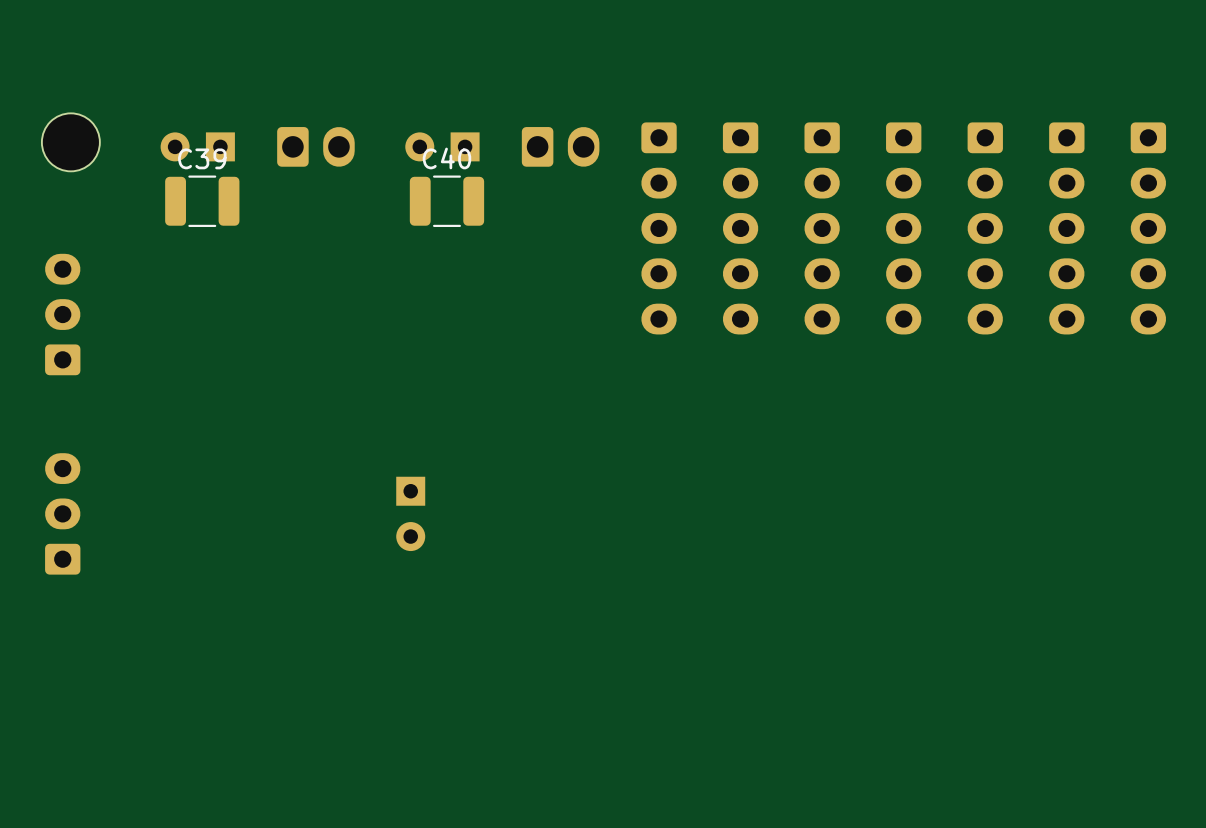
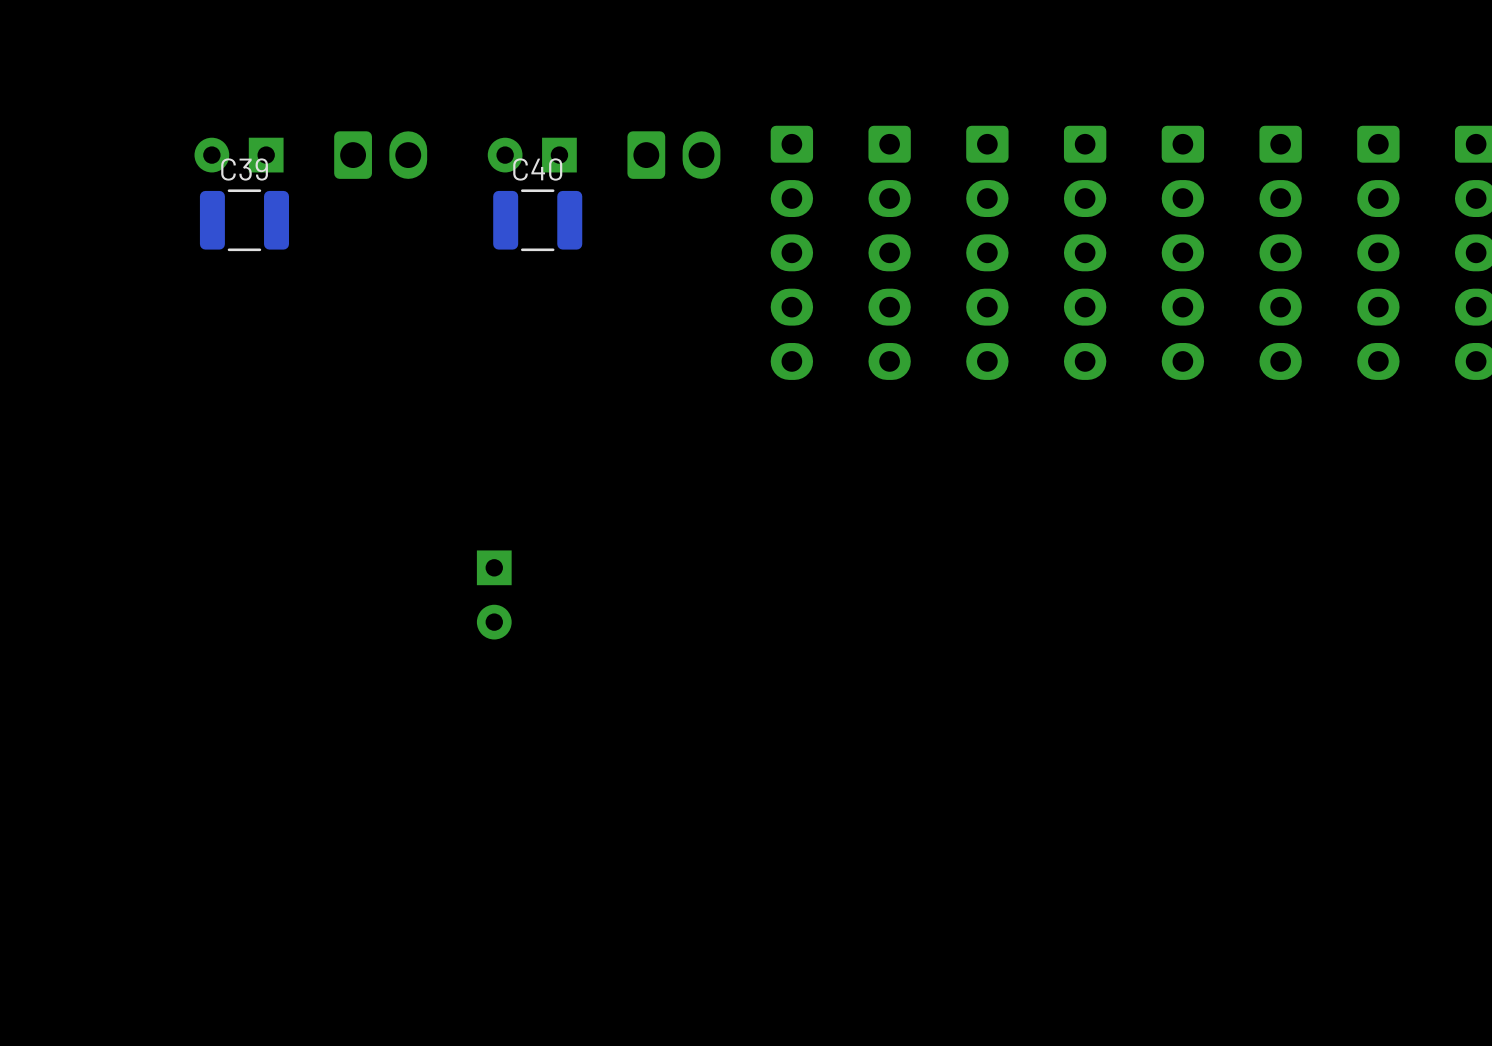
part: (70, 142) -> none
part: (62, 314) -> none
part: (62, 513) -> none

